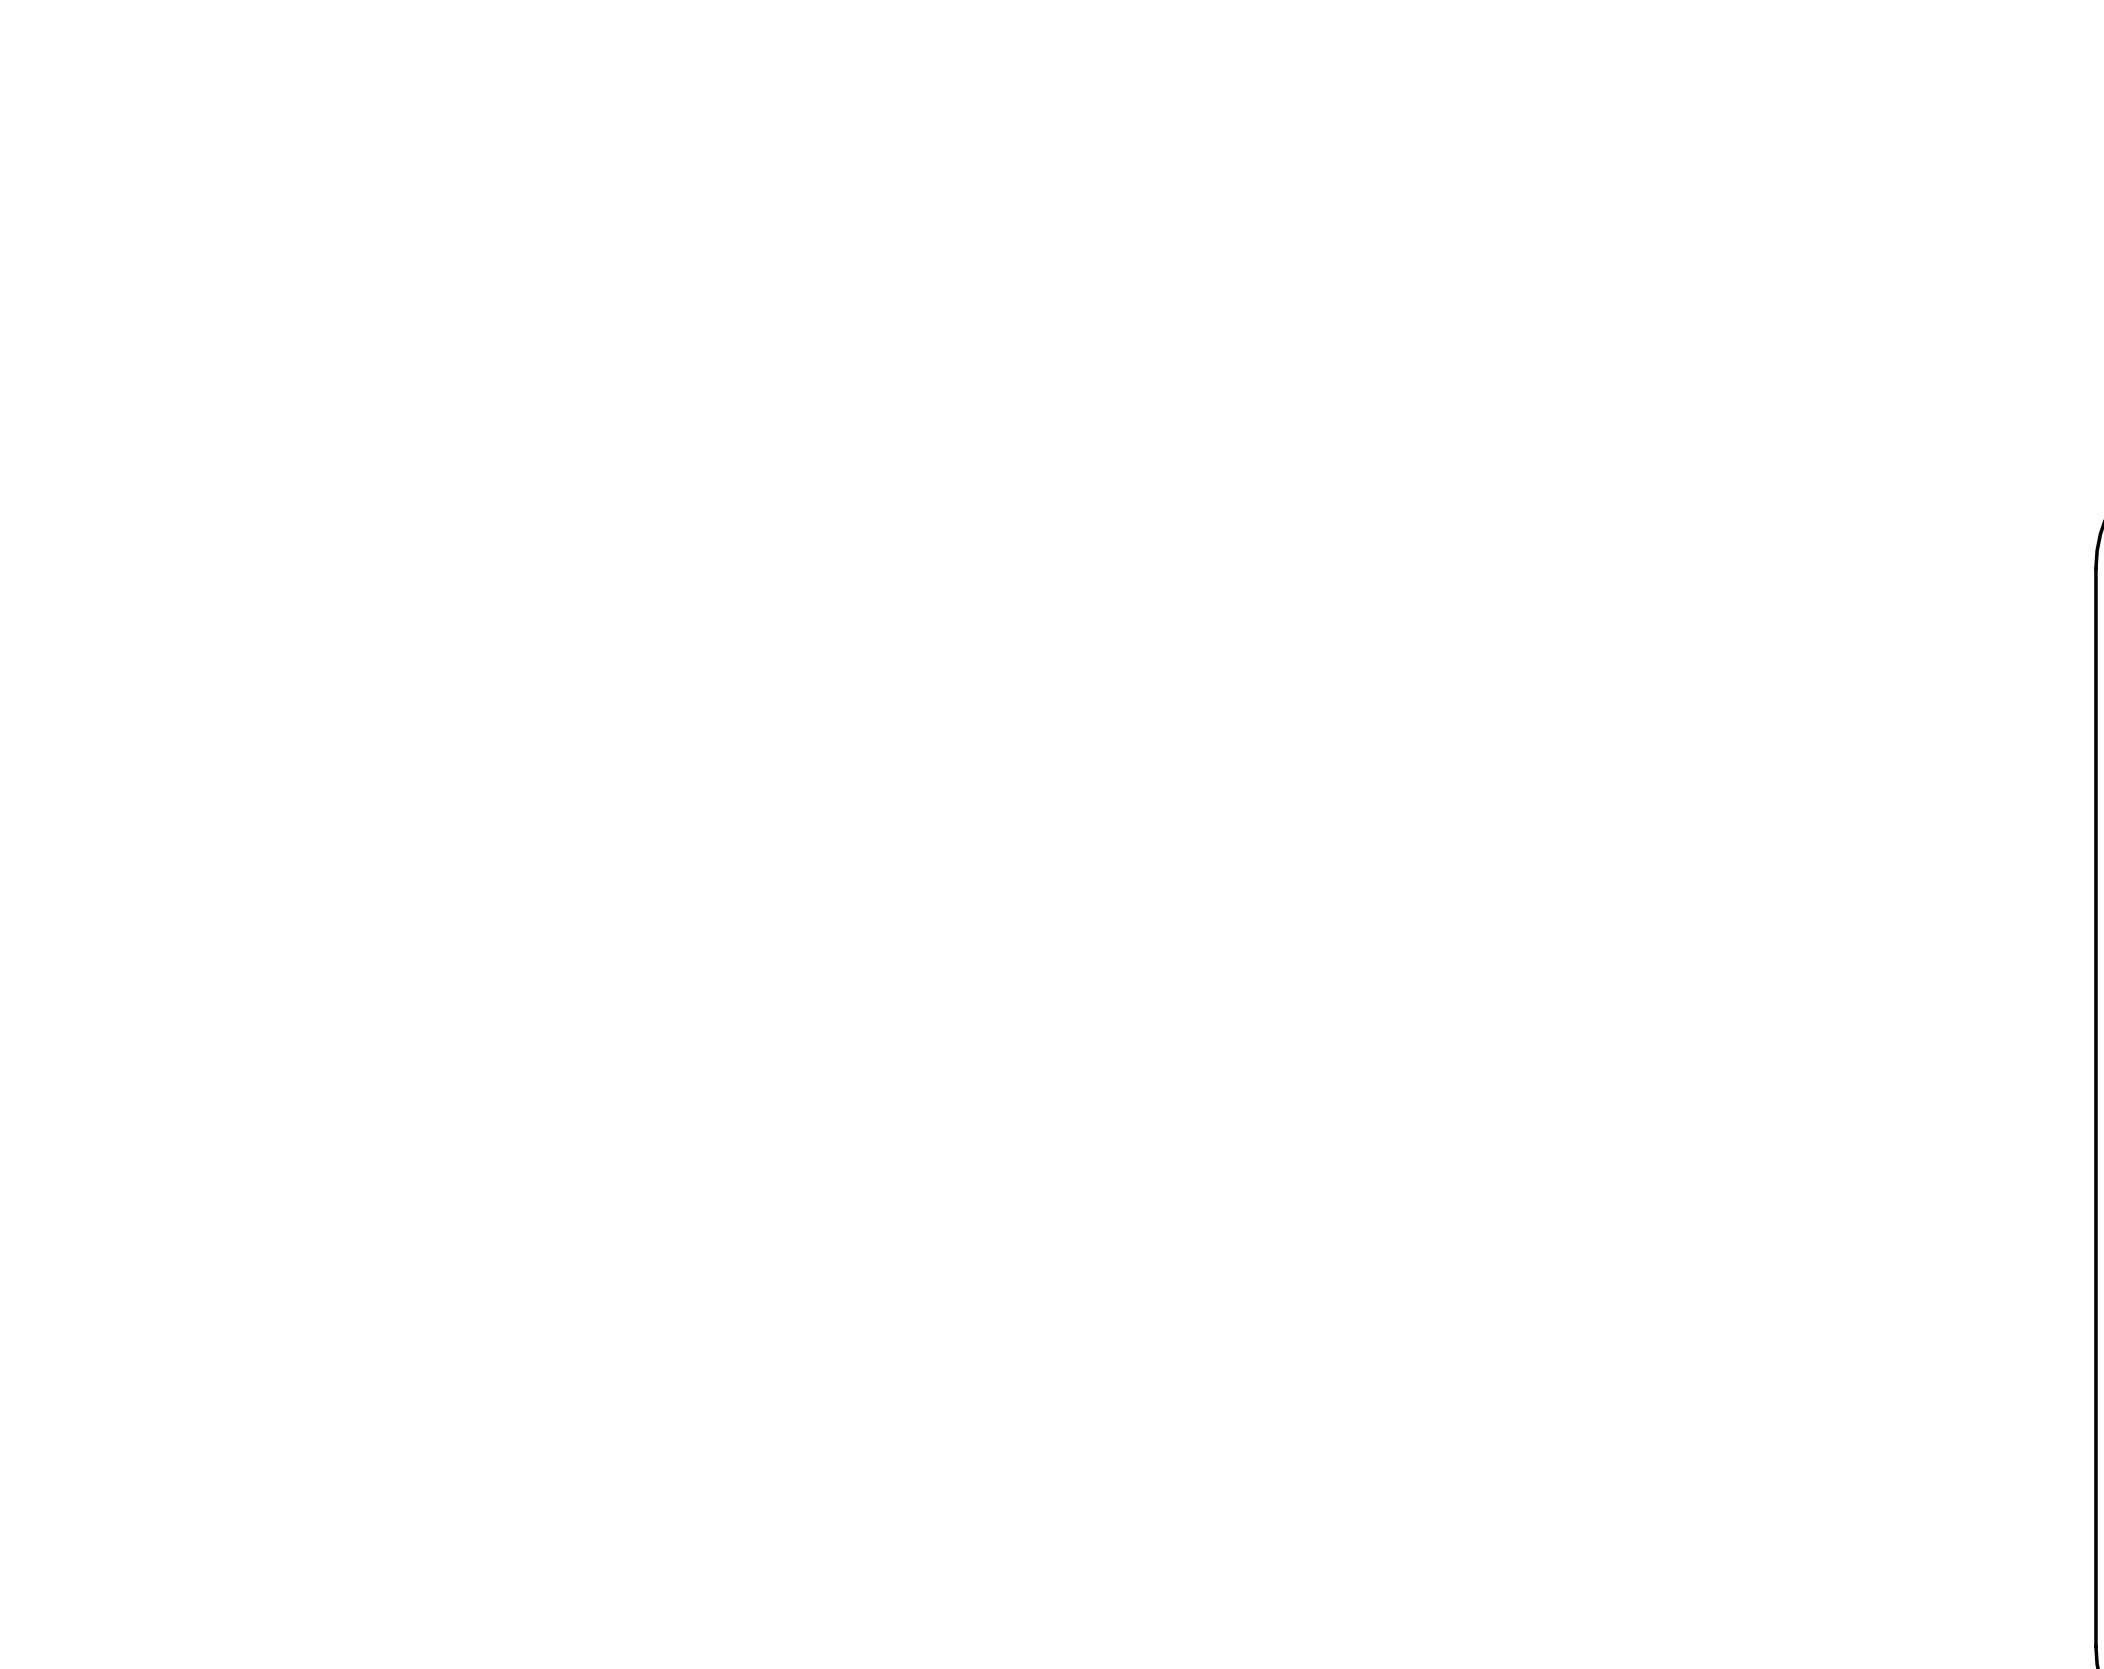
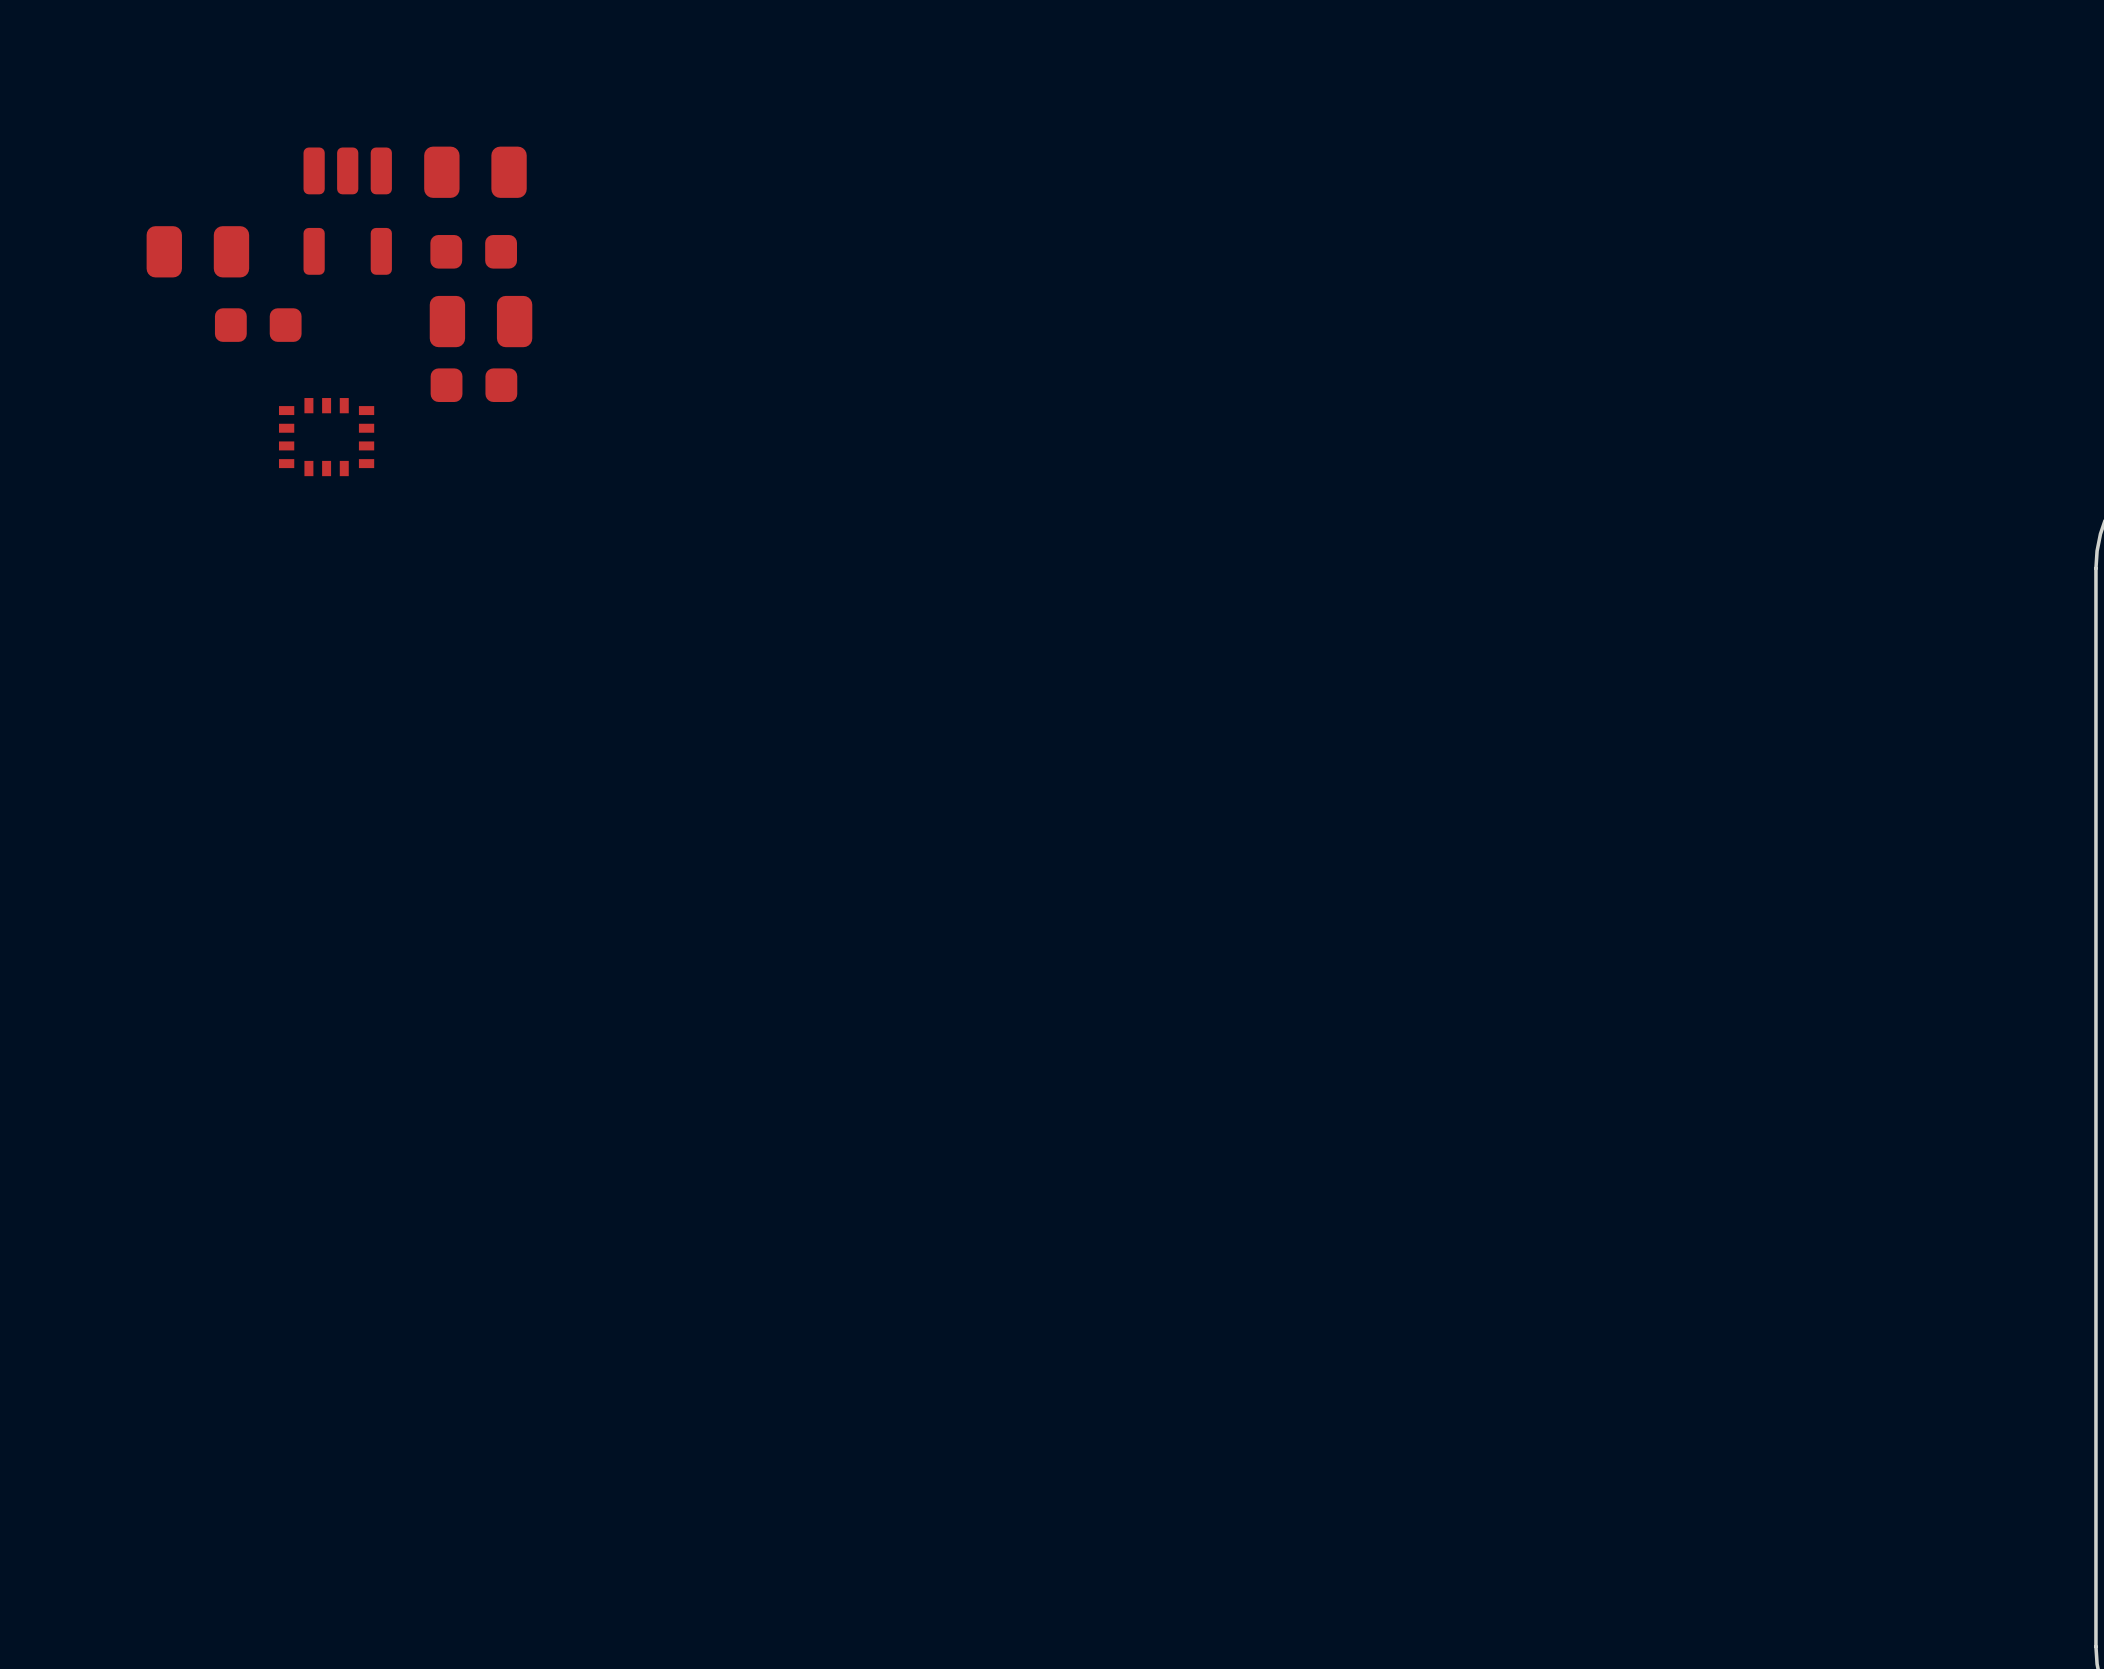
part: none -> (475, 172)
part: none -> (347, 211)
part: none -> (197, 251)
part: none -> (473, 251)
part: none -> (481, 321)
part: none -> (258, 325)
part: none -> (473, 385)
part: none -> (326, 437)

